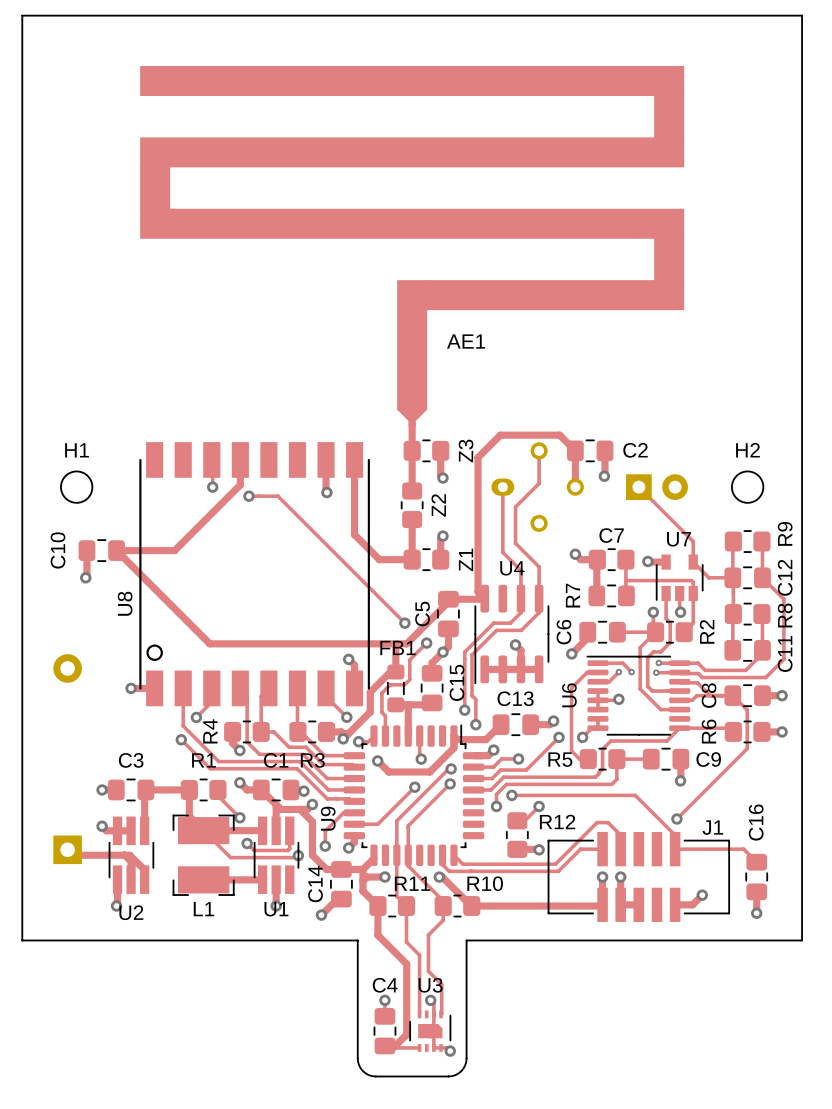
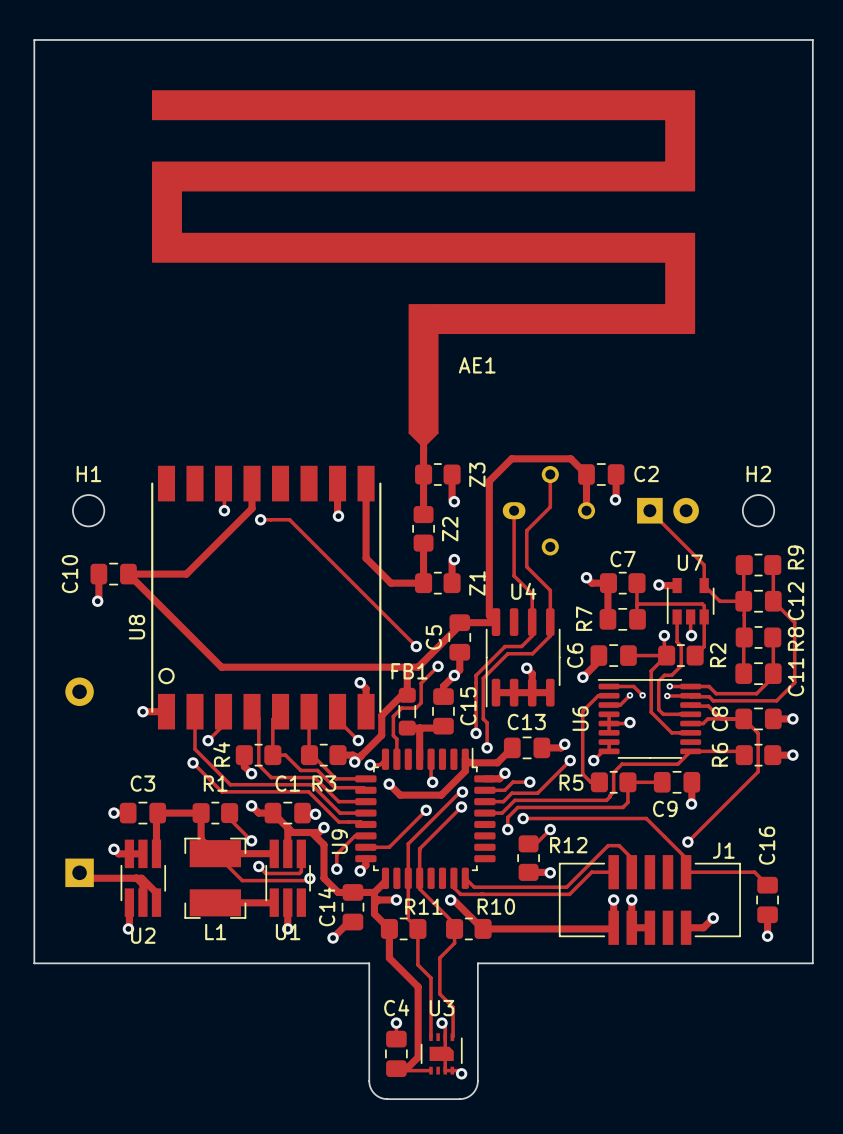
C9 name position: C9 (708, 759) -> C9 (665, 808)

